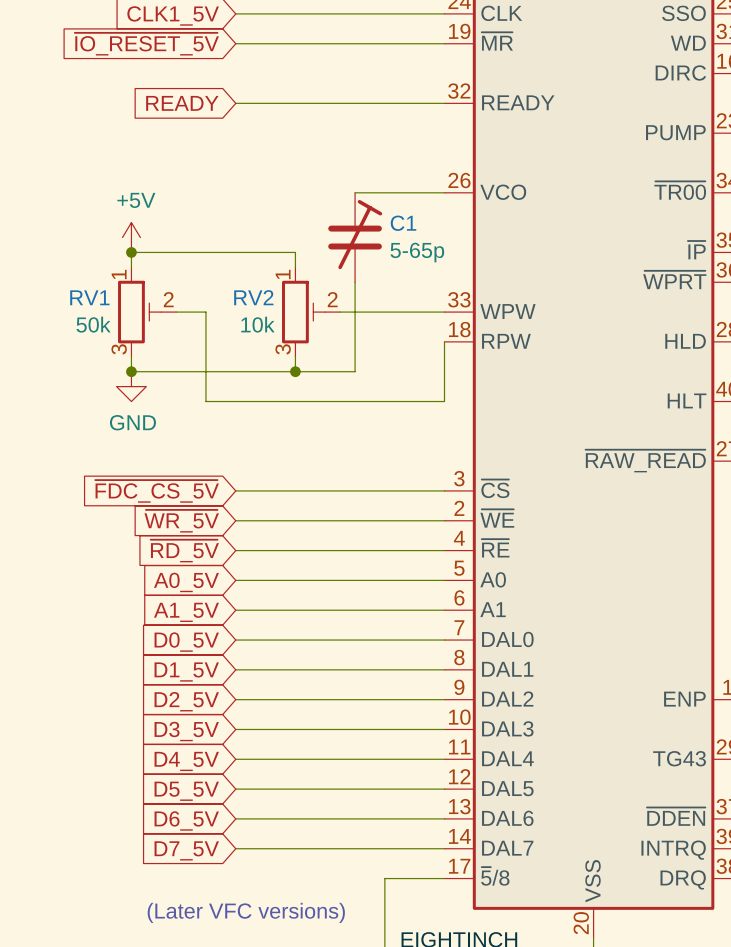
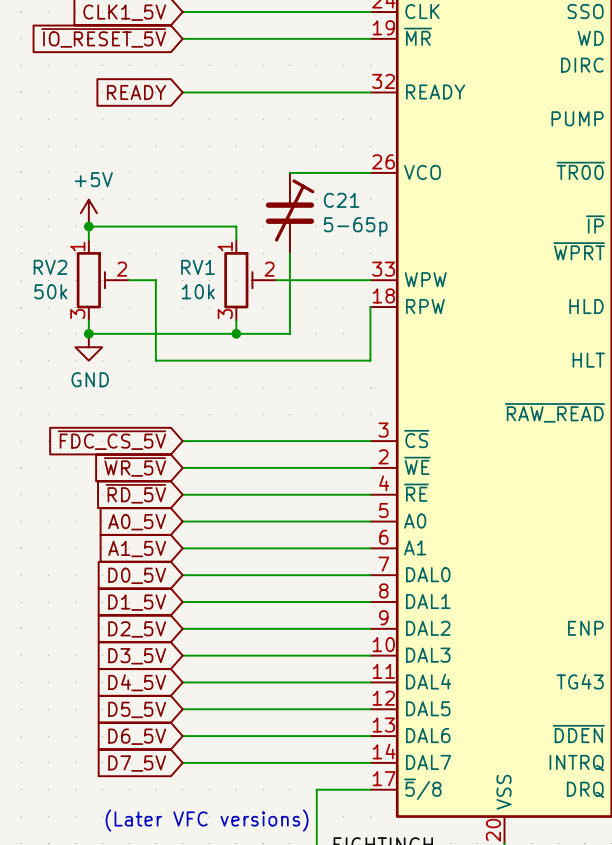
C1 name: C1 (403, 223) -> C21 (341, 200)
RV1 name: RV1 (89, 297) -> RV2 (50, 267)
RV2 name: RV2 (253, 297) -> RV1 (197, 267)

